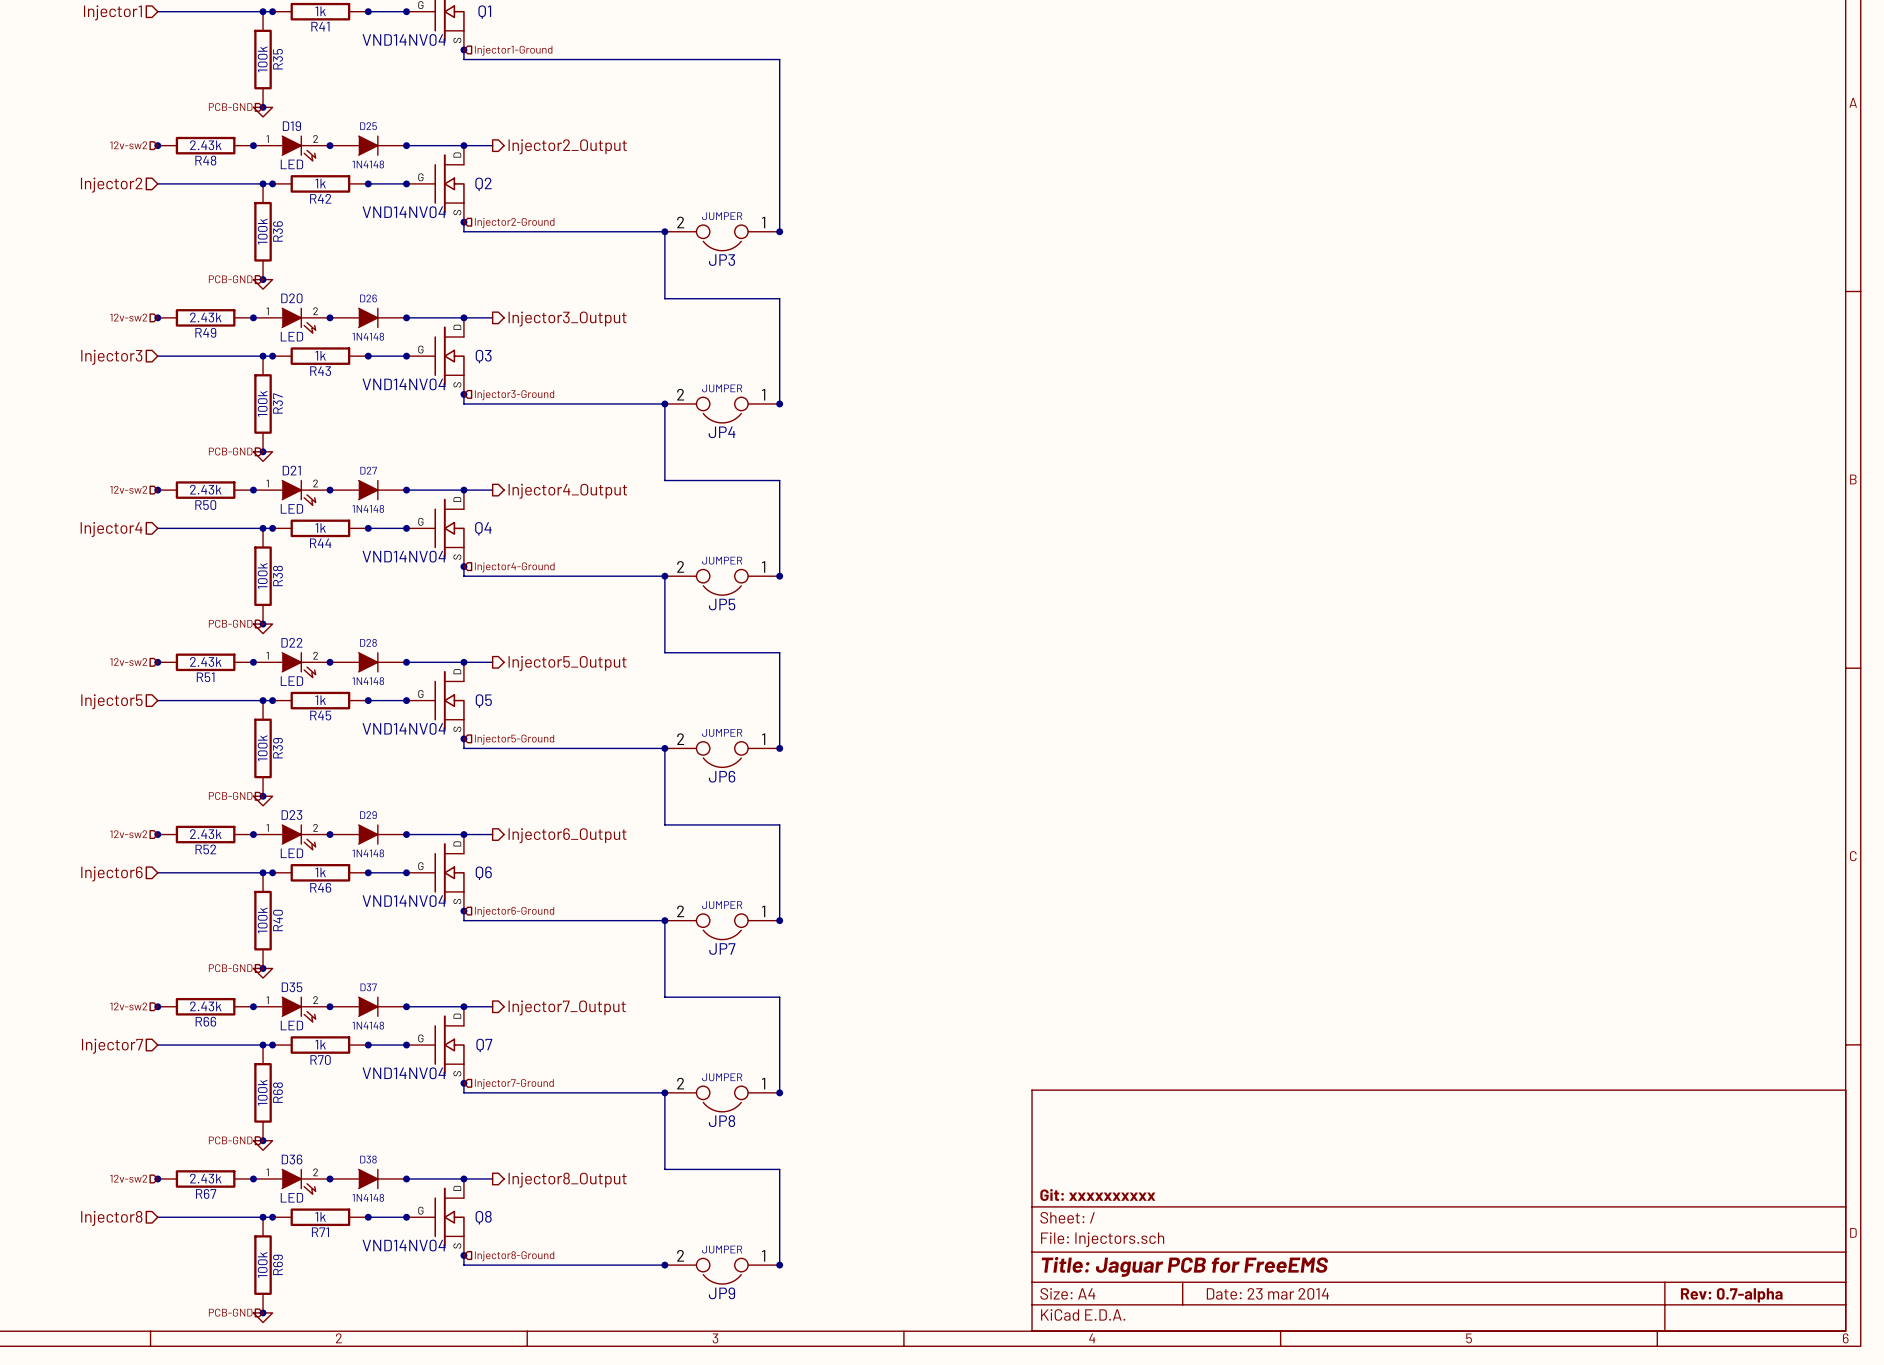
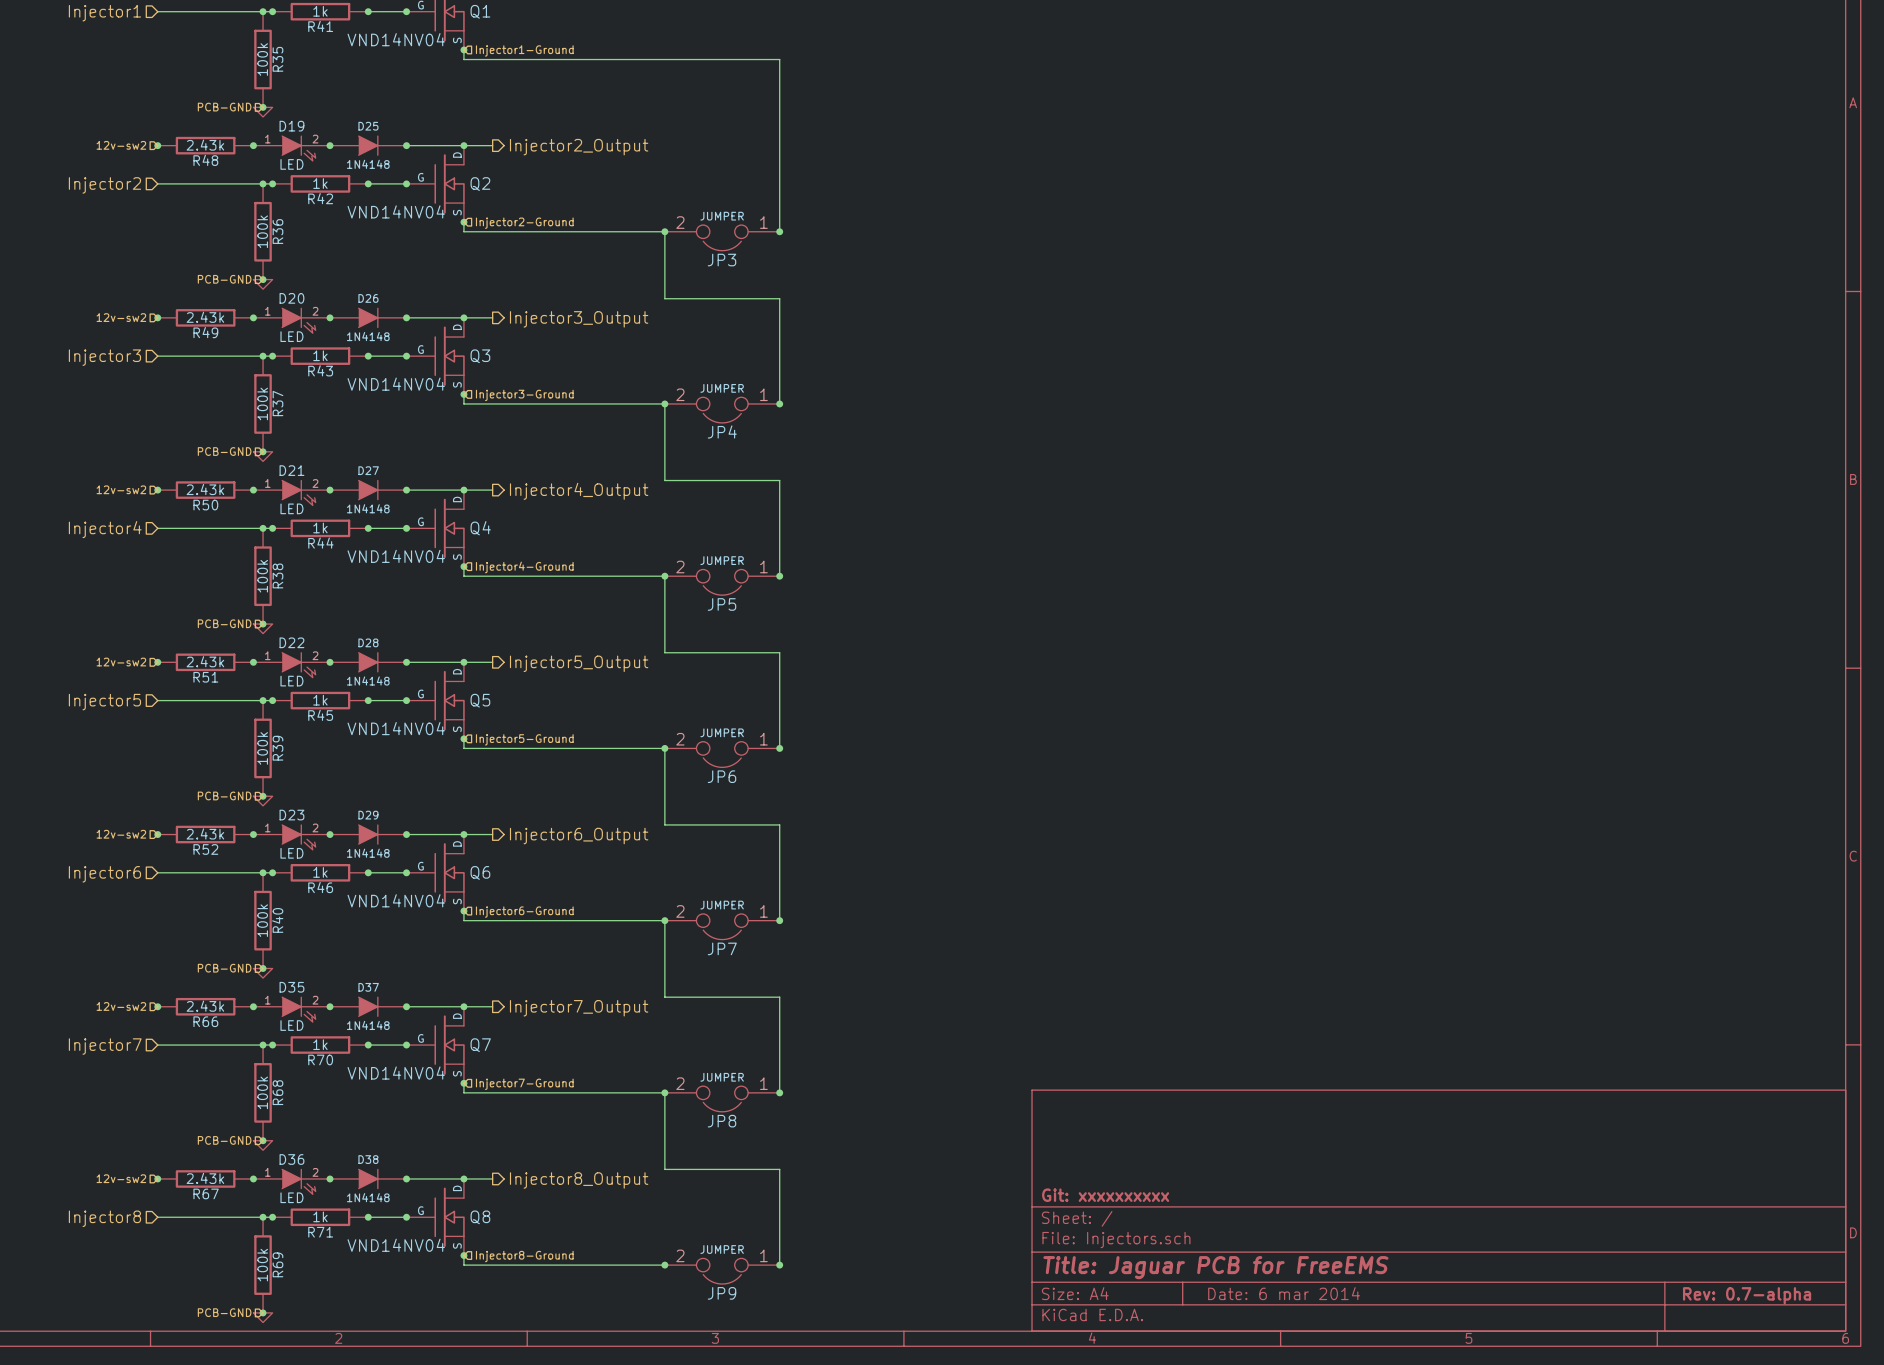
title block: Date: 23 mar 2014 (1267, 1293) -> Date: 6 mar 2014 (1284, 1293)

